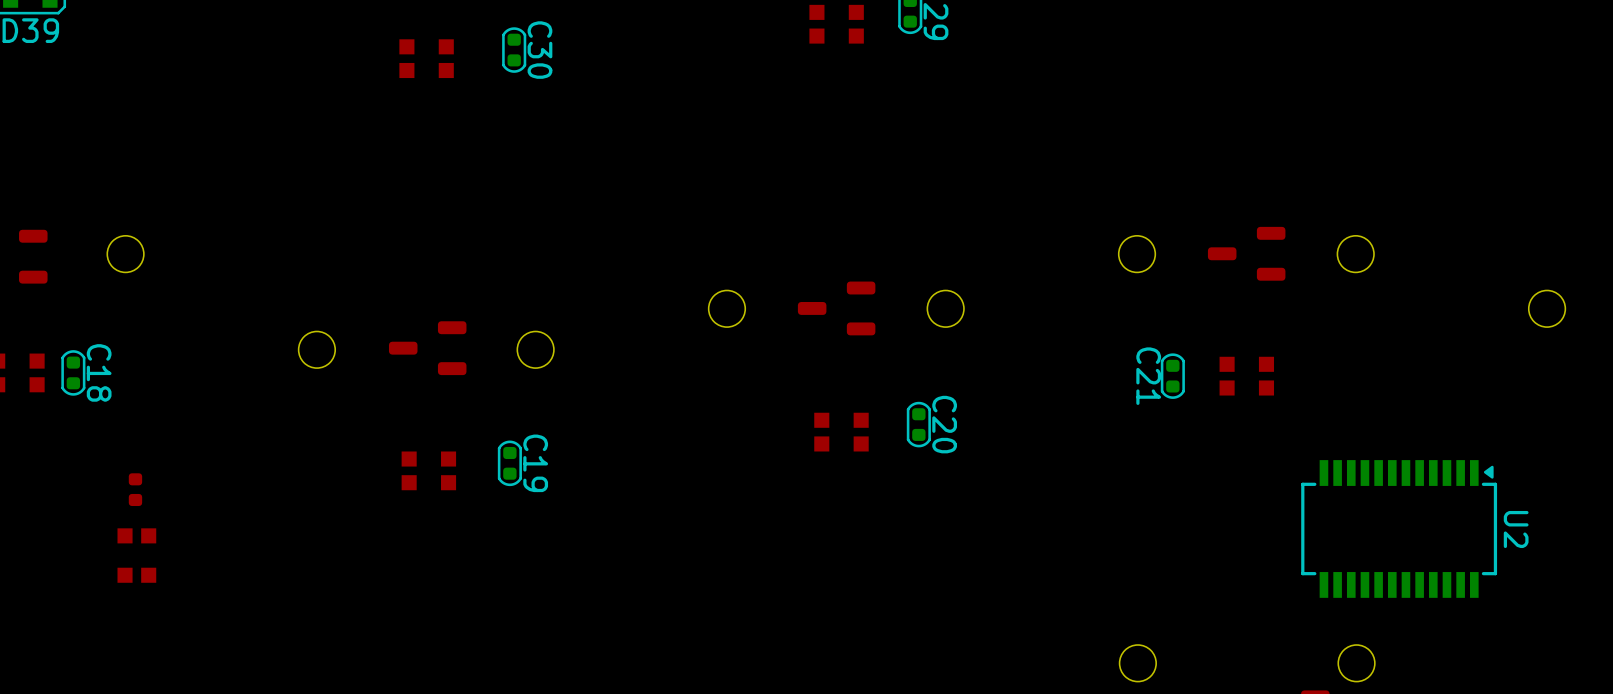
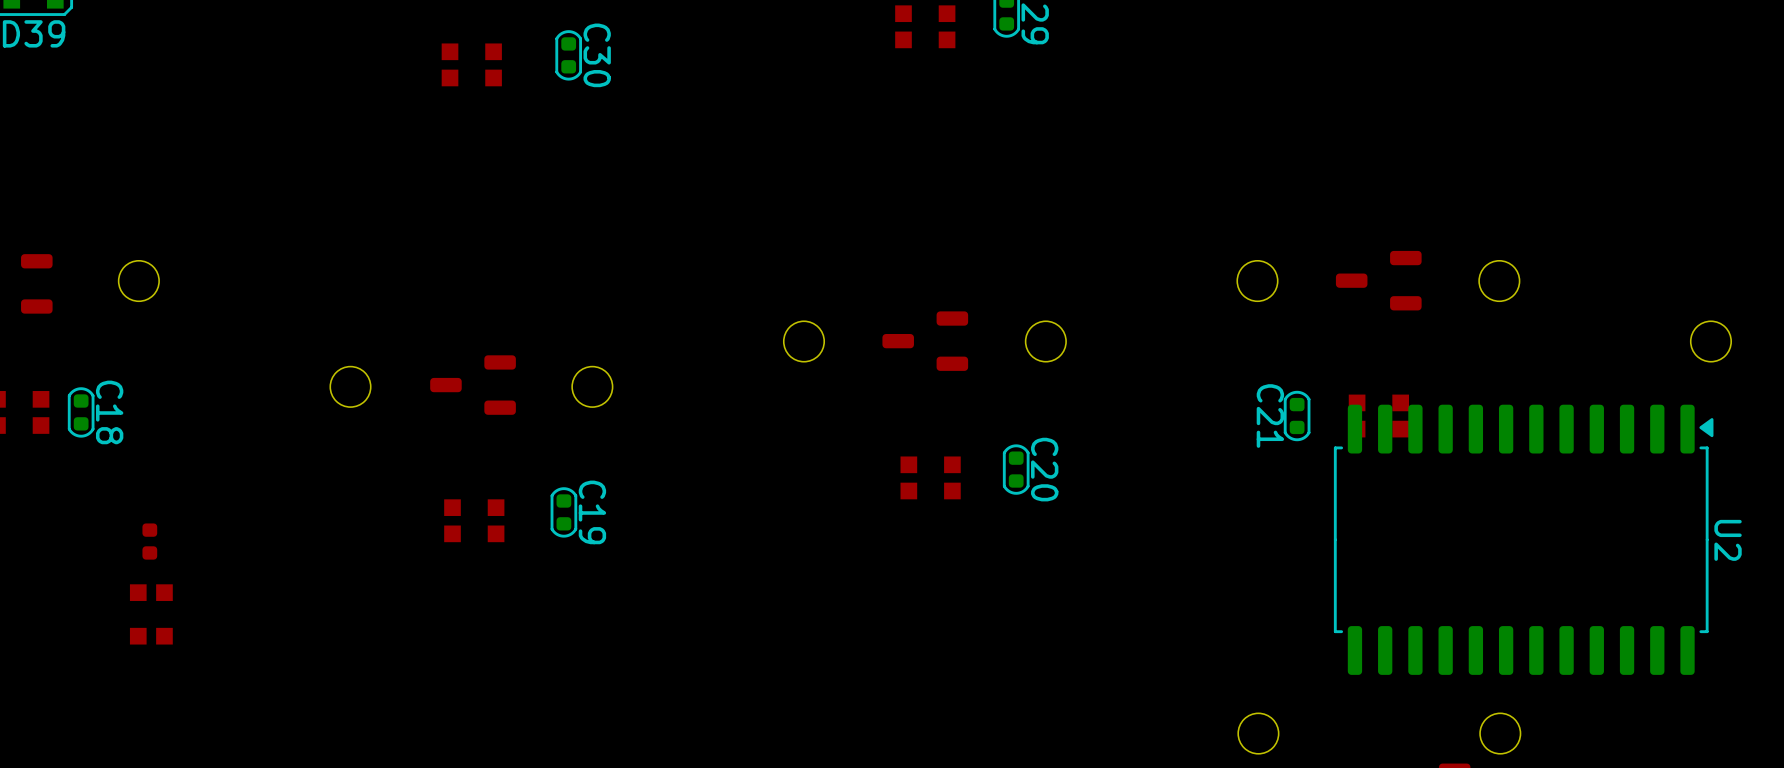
U2 footprint: [1301, 460, 1498, 598] -> [1333, 404, 1714, 675]
U2 name position: U2 (1516, 529) -> U2 (1728, 540)

